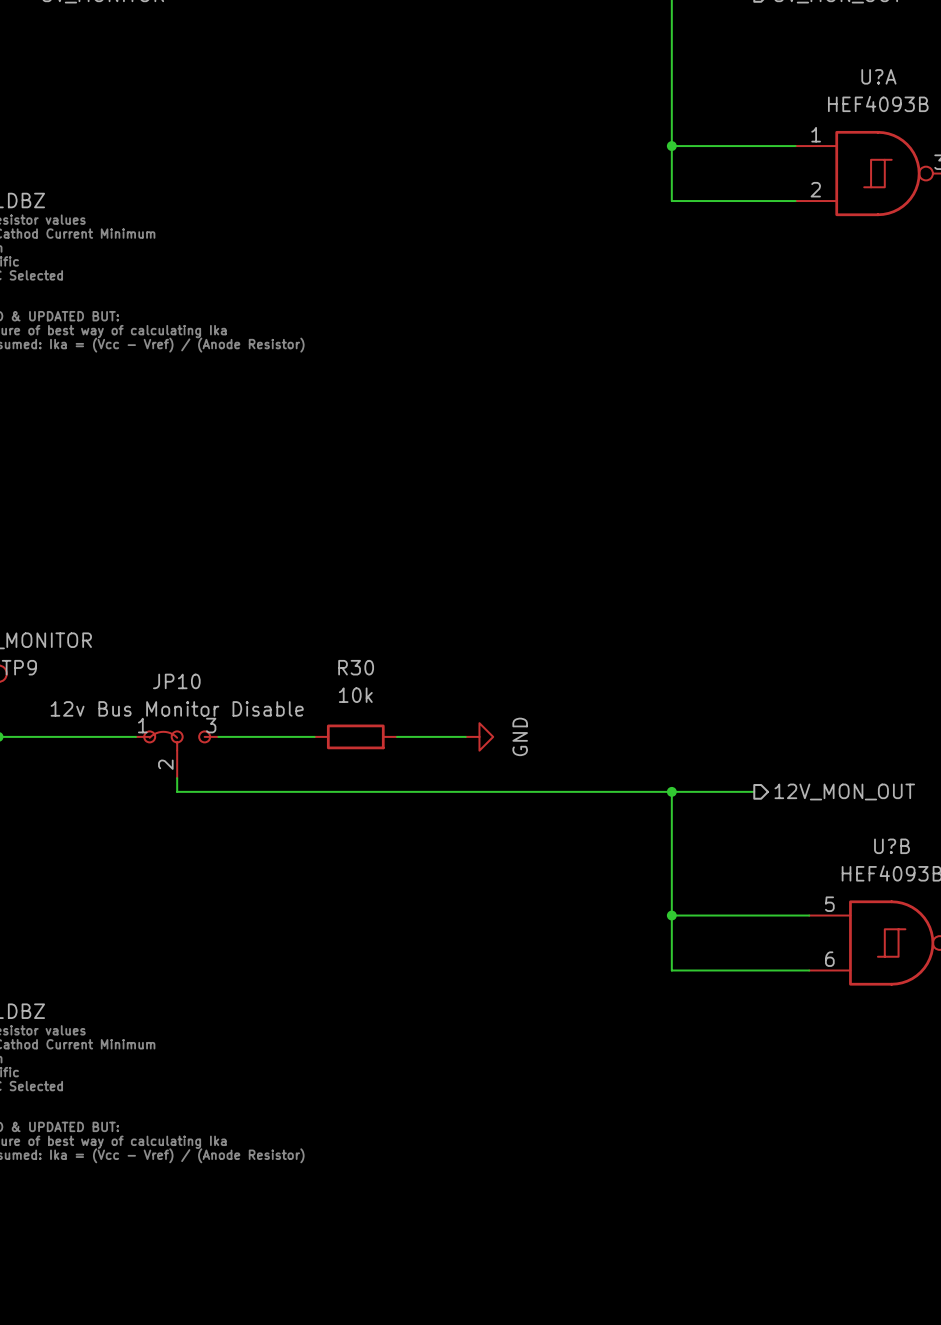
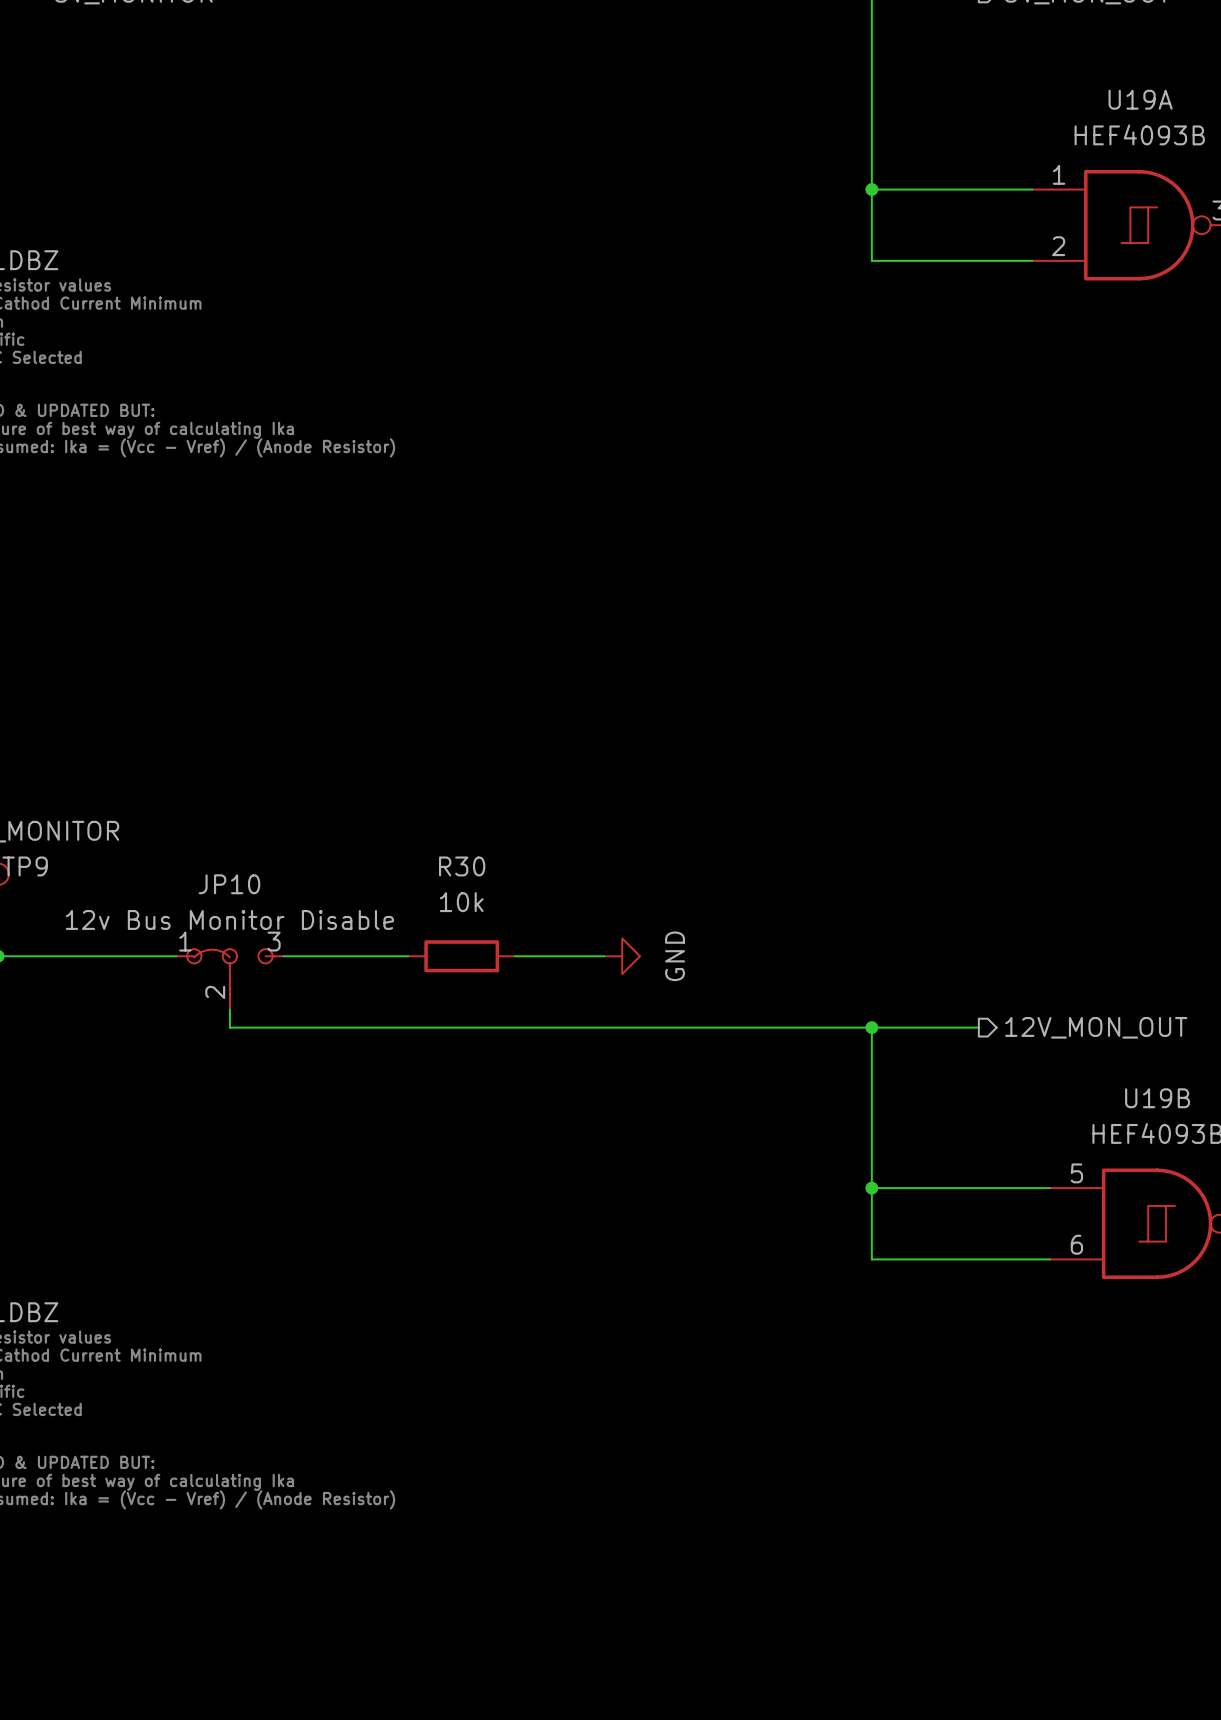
U?A name: U?A (878, 76) -> U19A (1140, 99)
U?B name: U?B (892, 846) -> U19B (1157, 1098)

